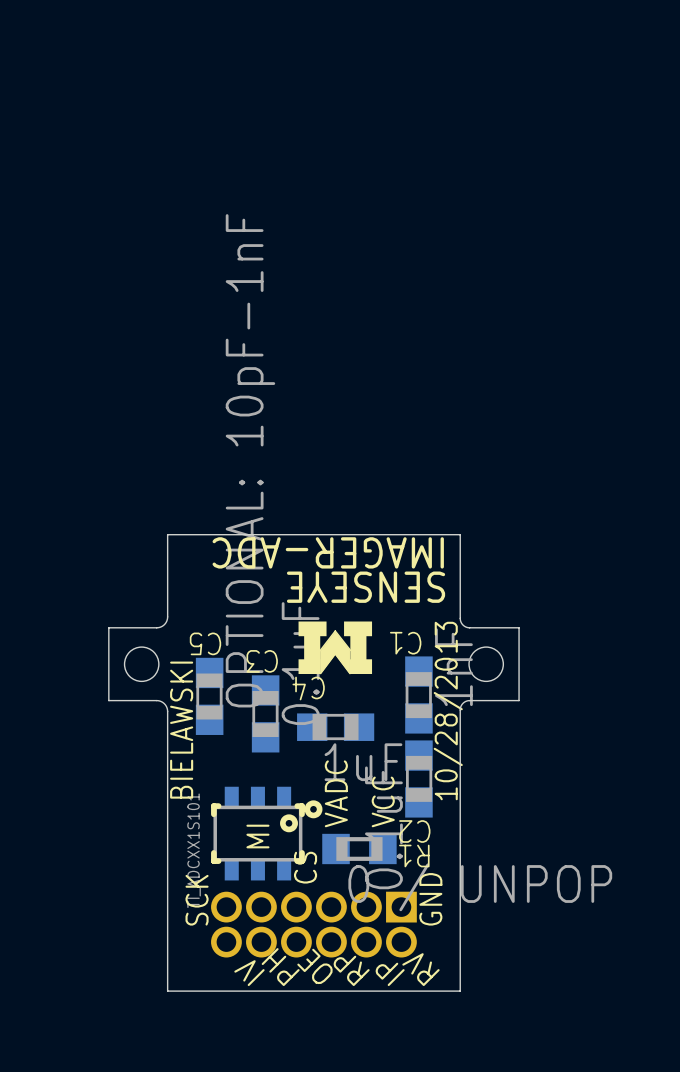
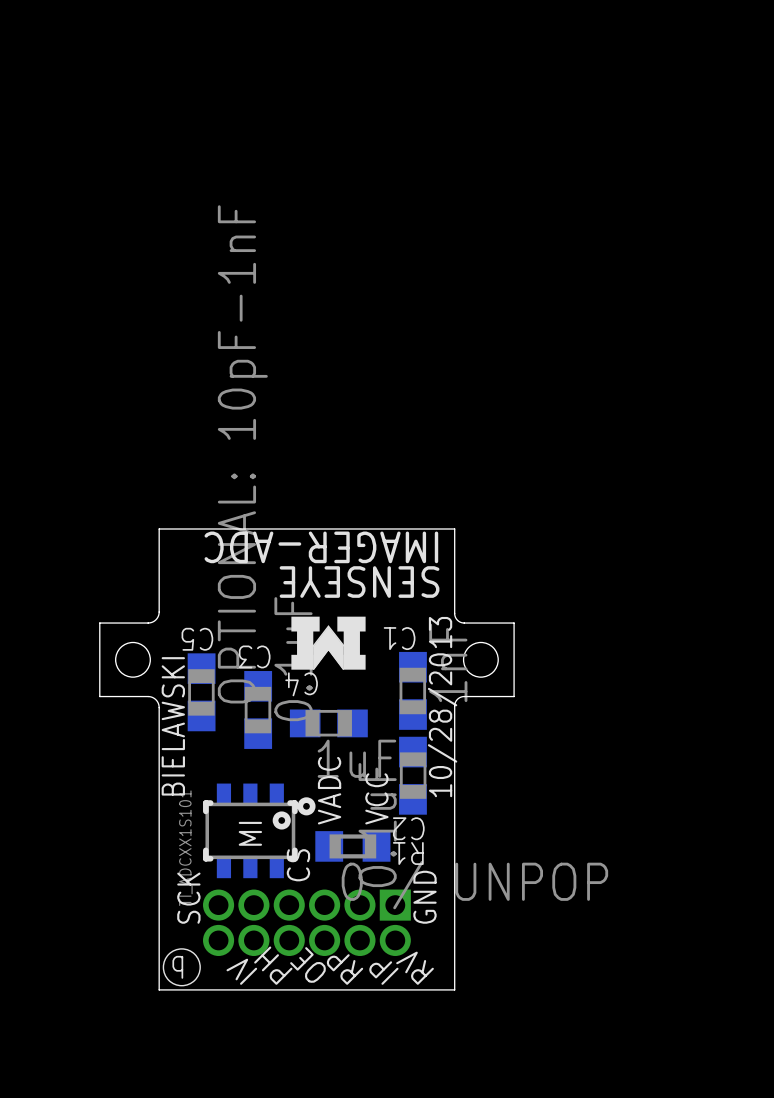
drawing: none -> [162, 948, 201, 987]
text: none -> b (177, 967)

